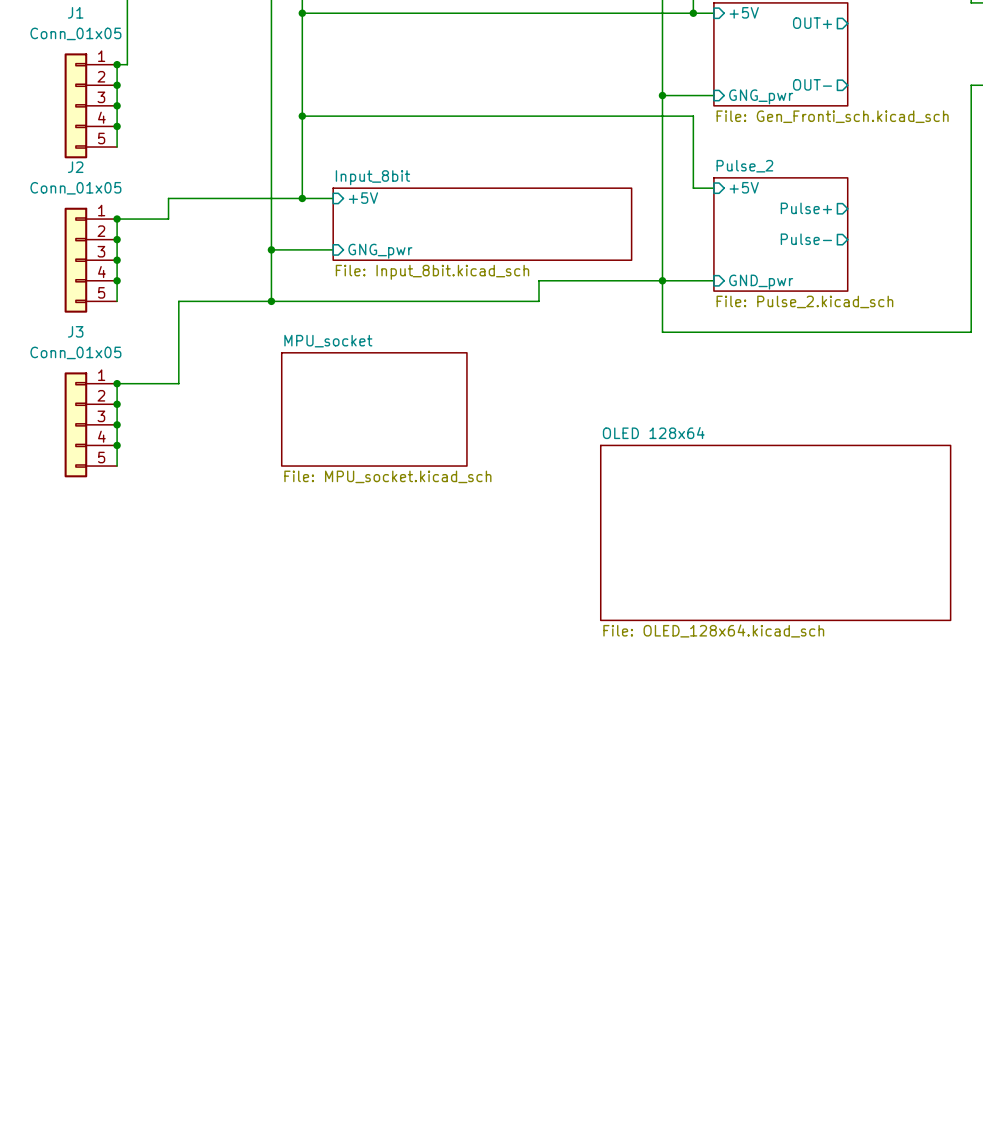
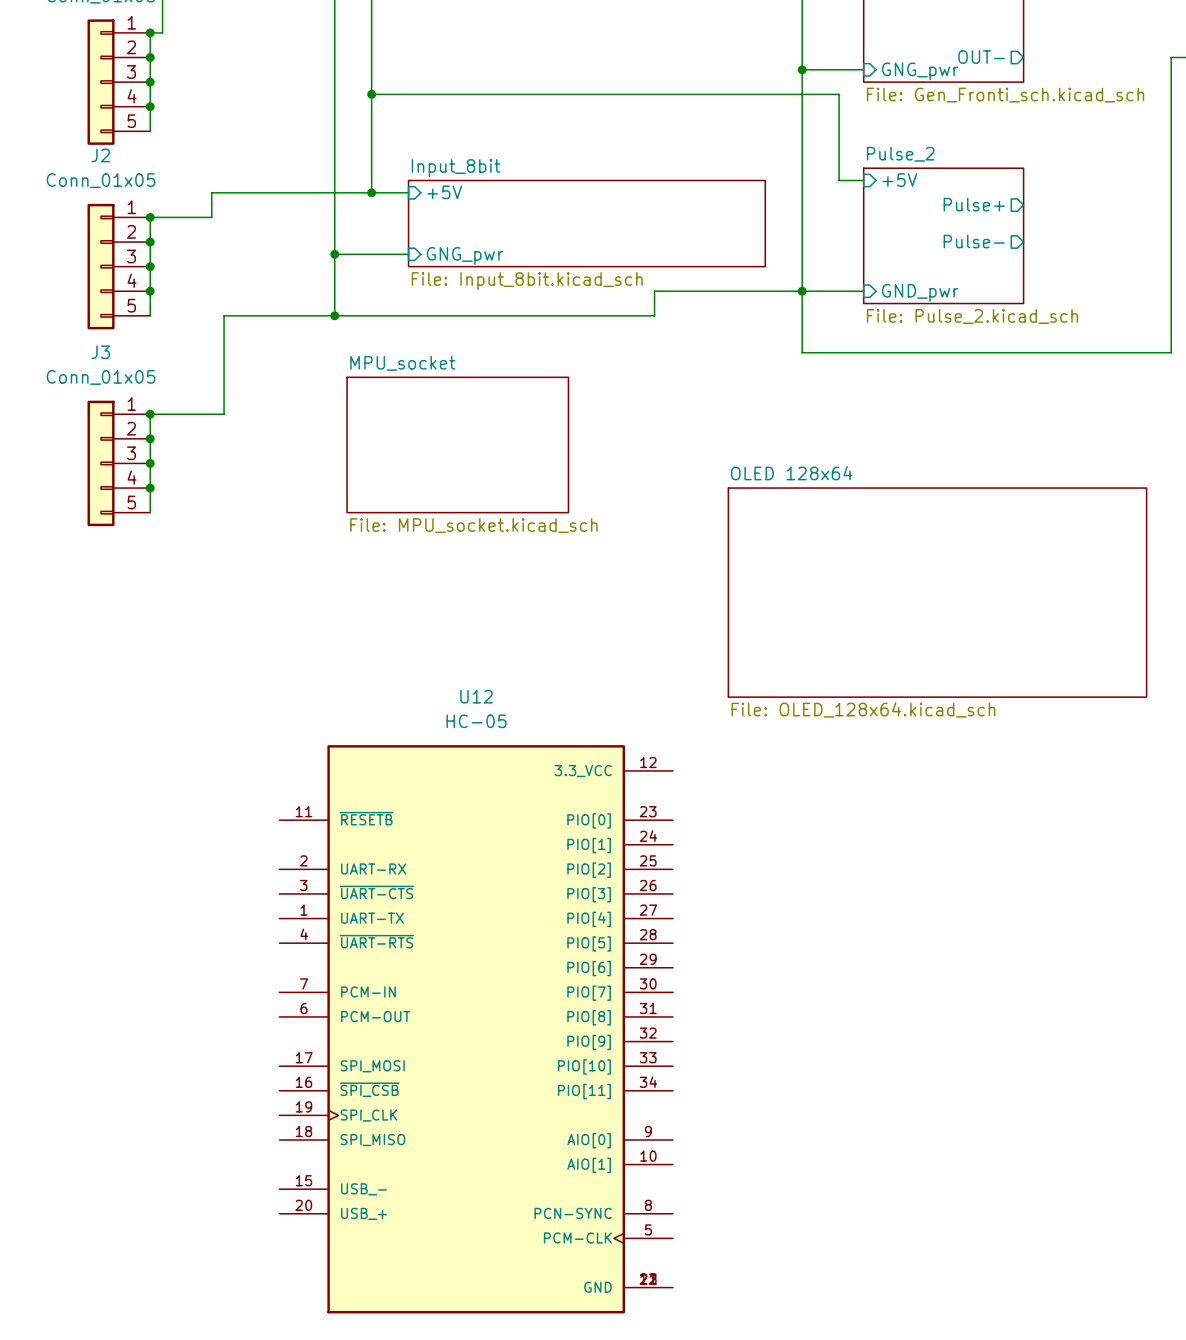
U12: none -> HC-05 (476, 1029)

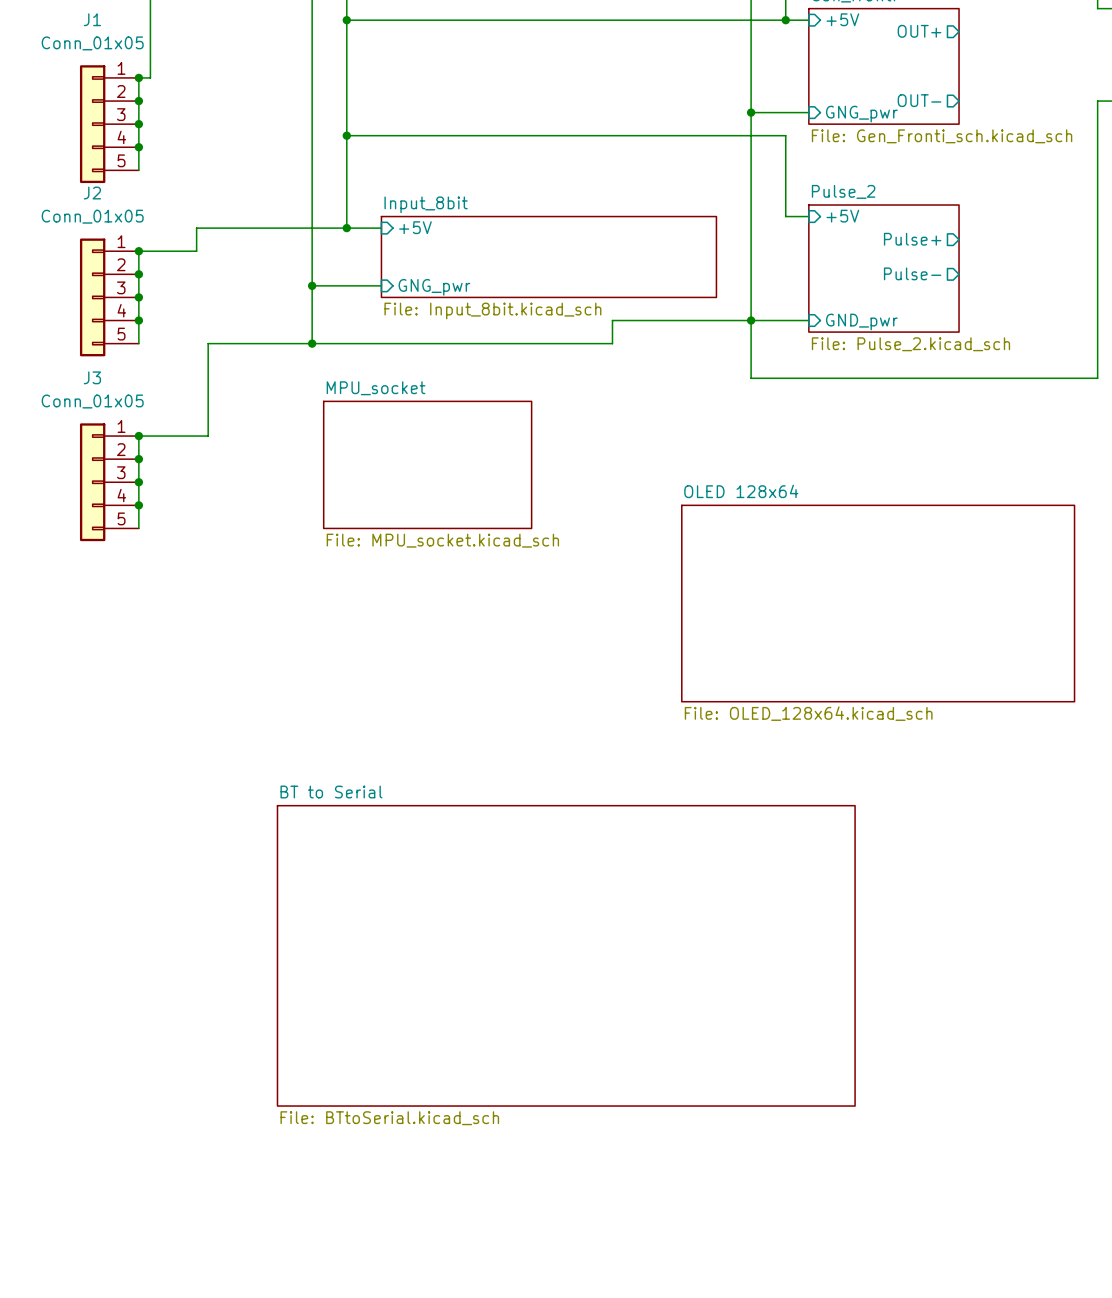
sheet BT to Serial: none -> File: BTtoSerial.kicad_sch (566, 955)
U12: HC-05 (476, 1029) -> none

